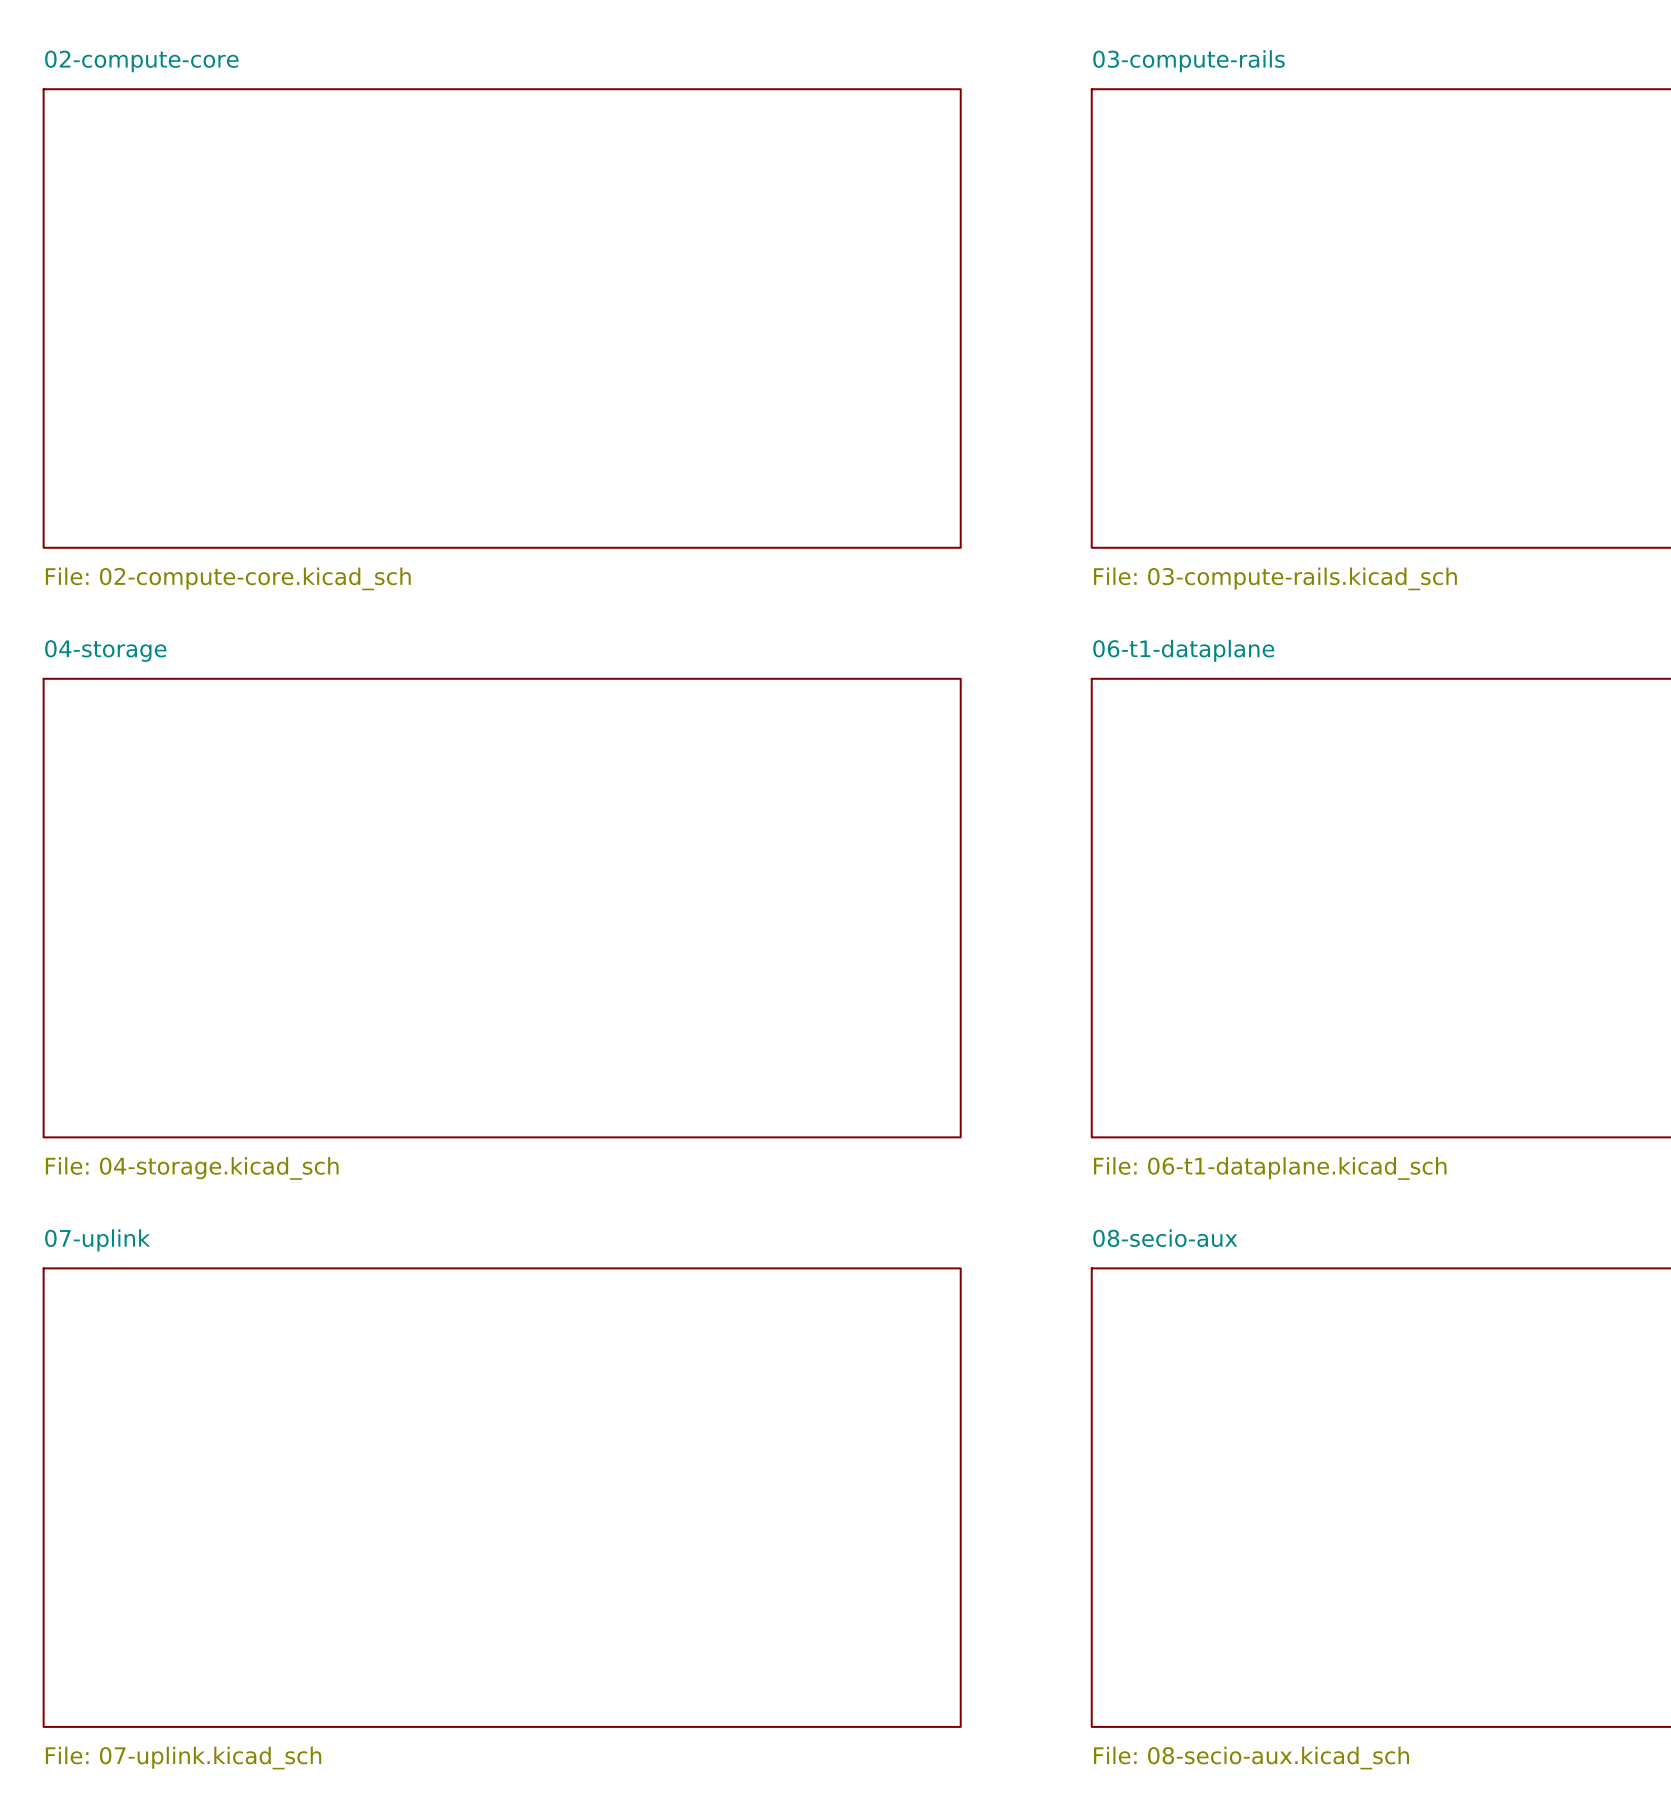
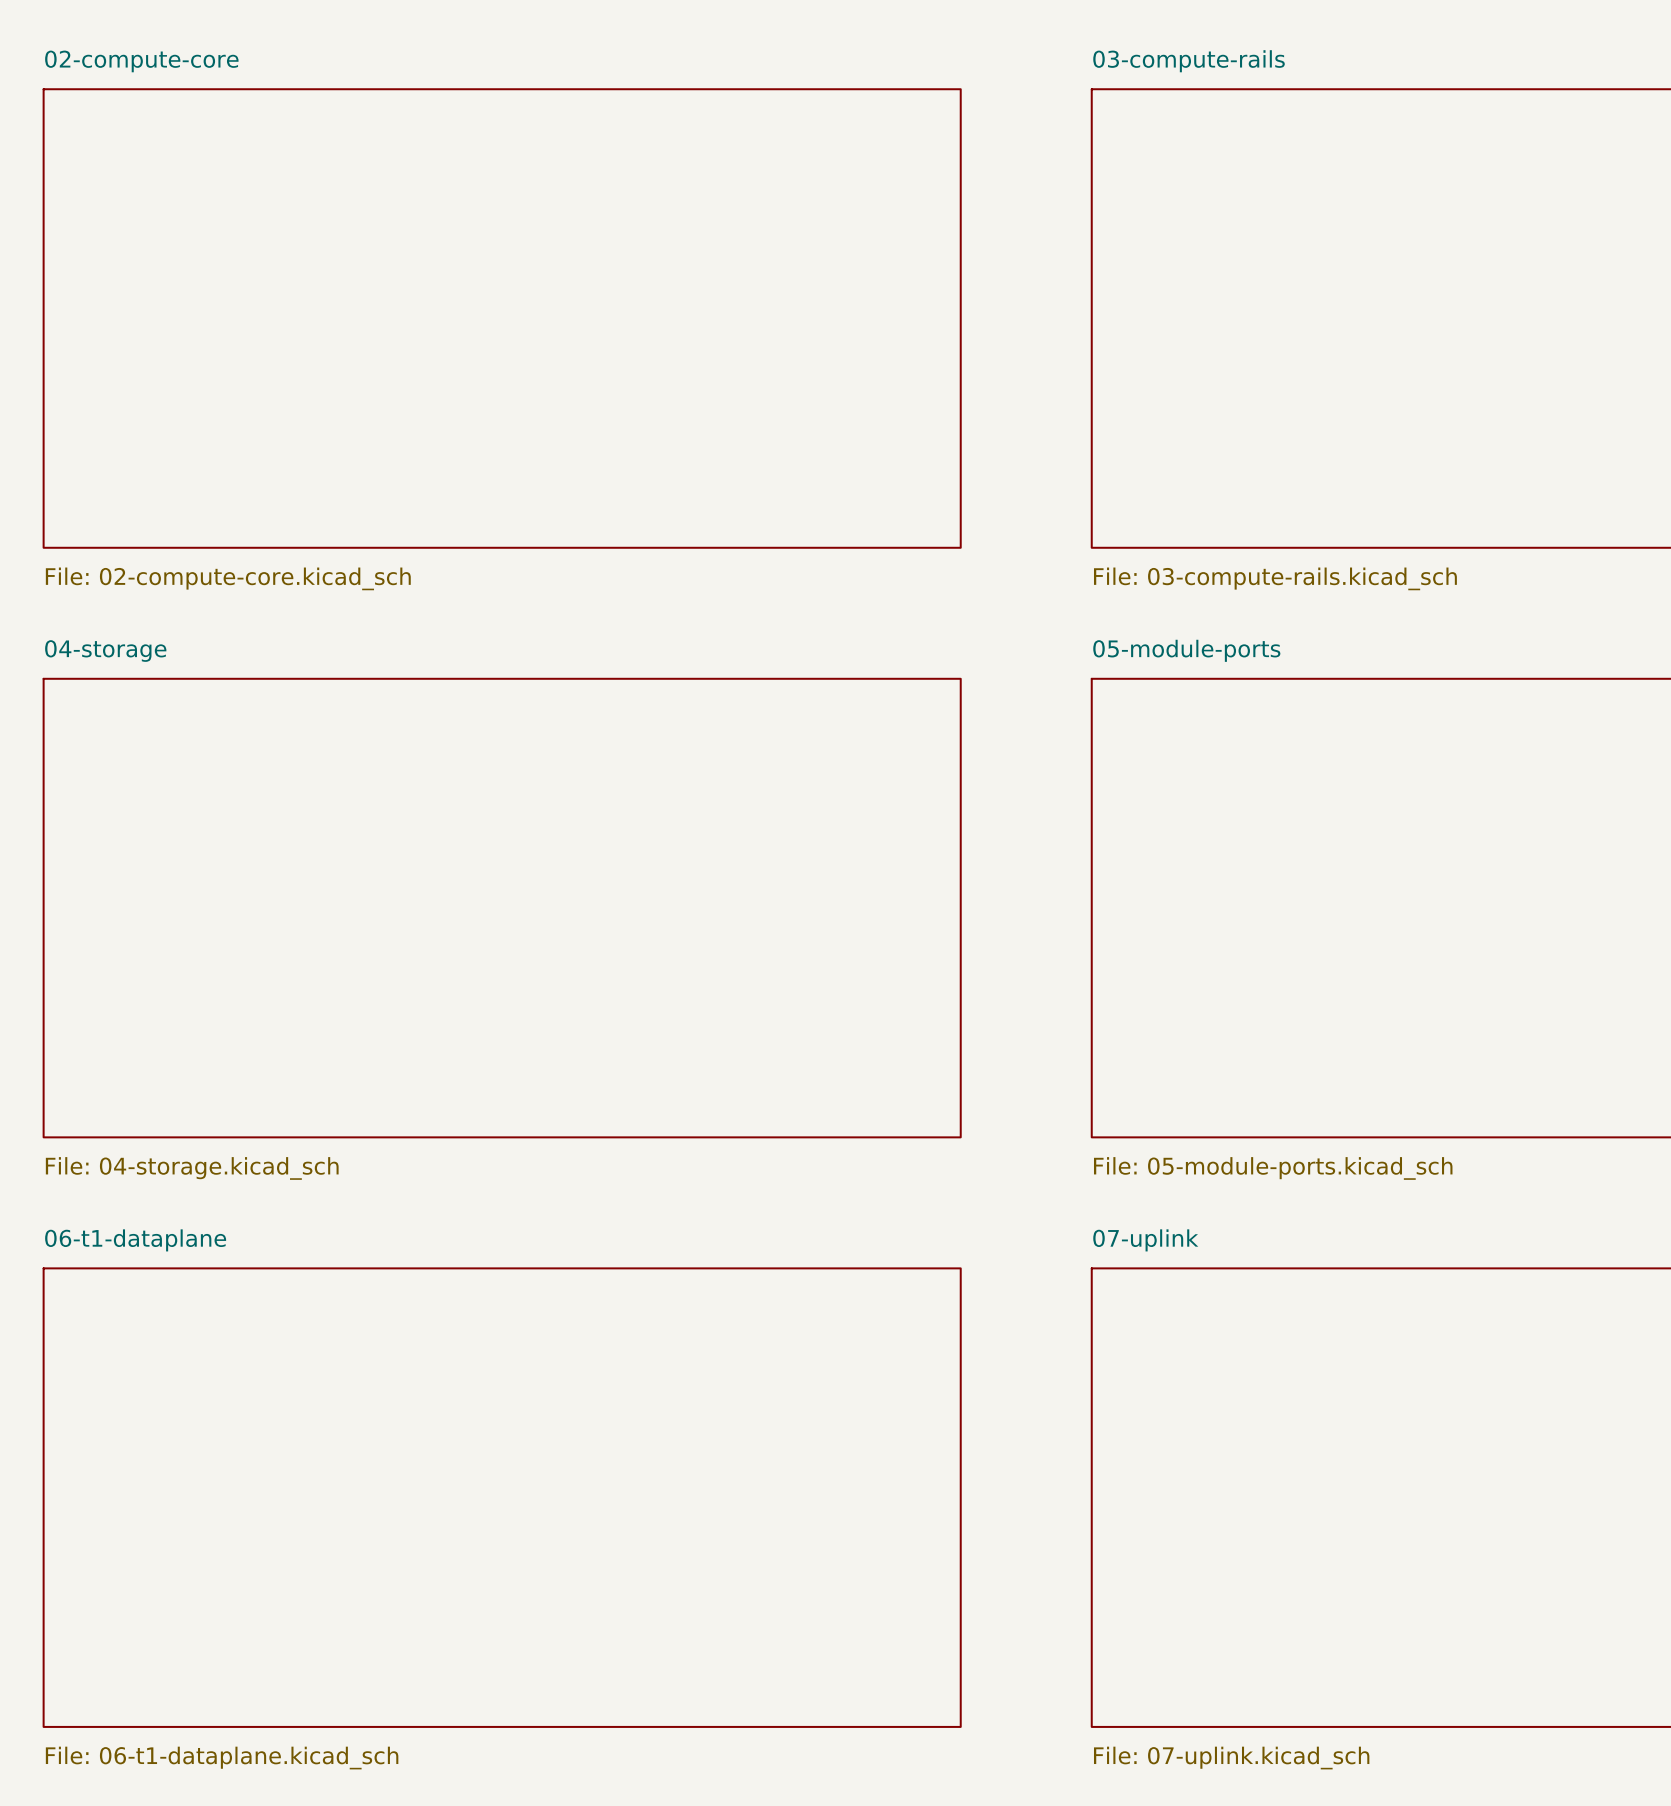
sheet 06-t1-dataplane name: 06-t1-dataplane (1183, 650) -> 05-module-ports (1186, 650)
sheet 06-t1-dataplane value: File: 06-t1-dataplane.kicad_sch (1270, 1168) -> File: 05-module-ports.kicad_sch (1273, 1168)
sheet 08-secio-aux name: 08-secio-aux (1165, 1238) -> 07-uplink (1145, 1240)
sheet 07-uplink name: 07-uplink (97, 1240) -> 06-t1-dataplane (135, 1240)
sheet 07-uplink value: File: 07-uplink.kicad_sch (183, 1758) -> File: 06-t1-dataplane.kicad_sch (222, 1758)
sheet 08-secio-aux value: File: 08-secio-aux.kicad_sch (1251, 1758) -> File: 07-uplink.kicad_sch (1231, 1758)

